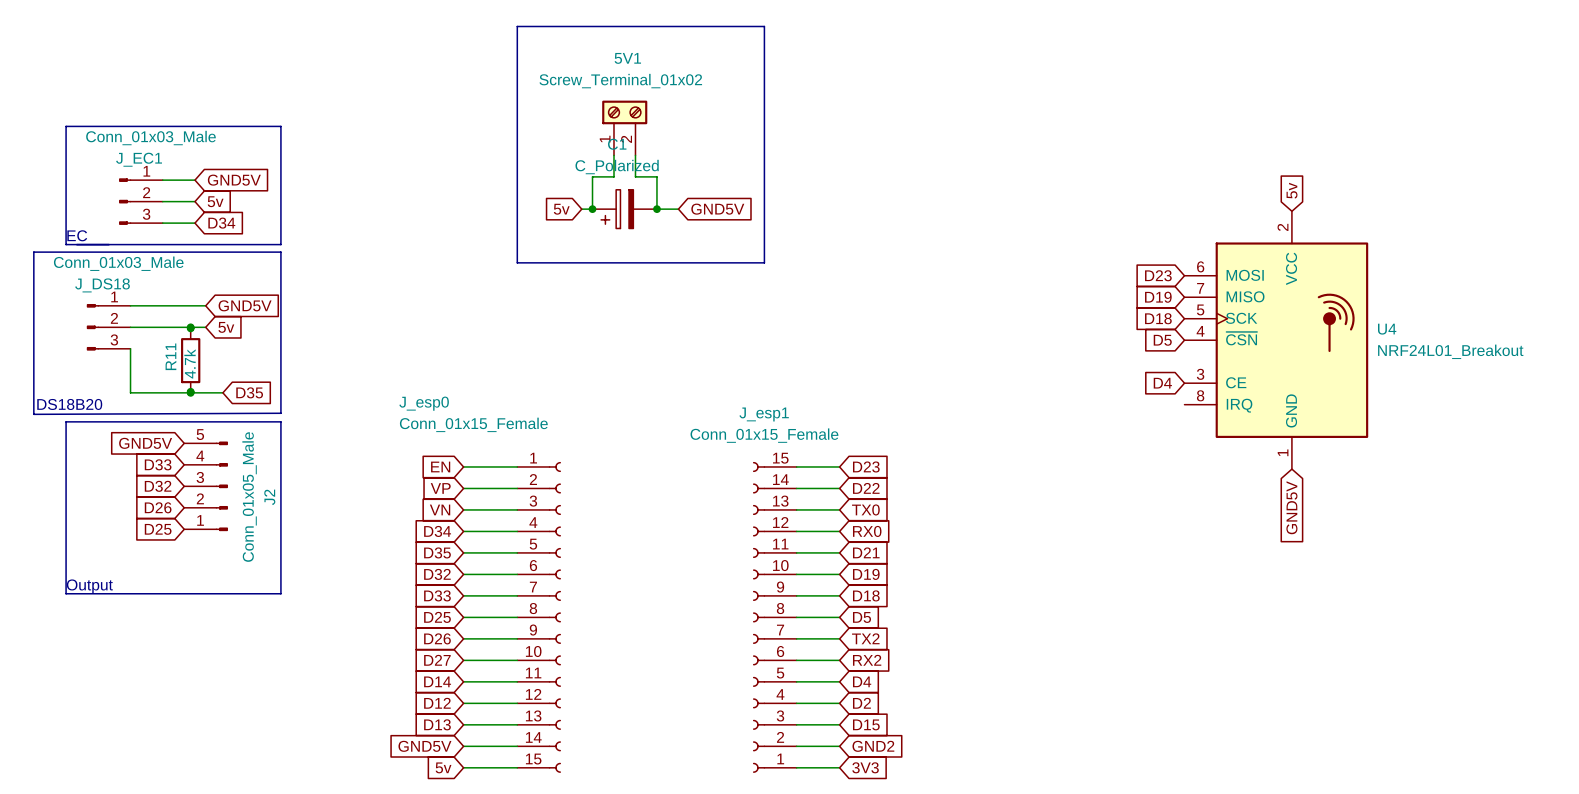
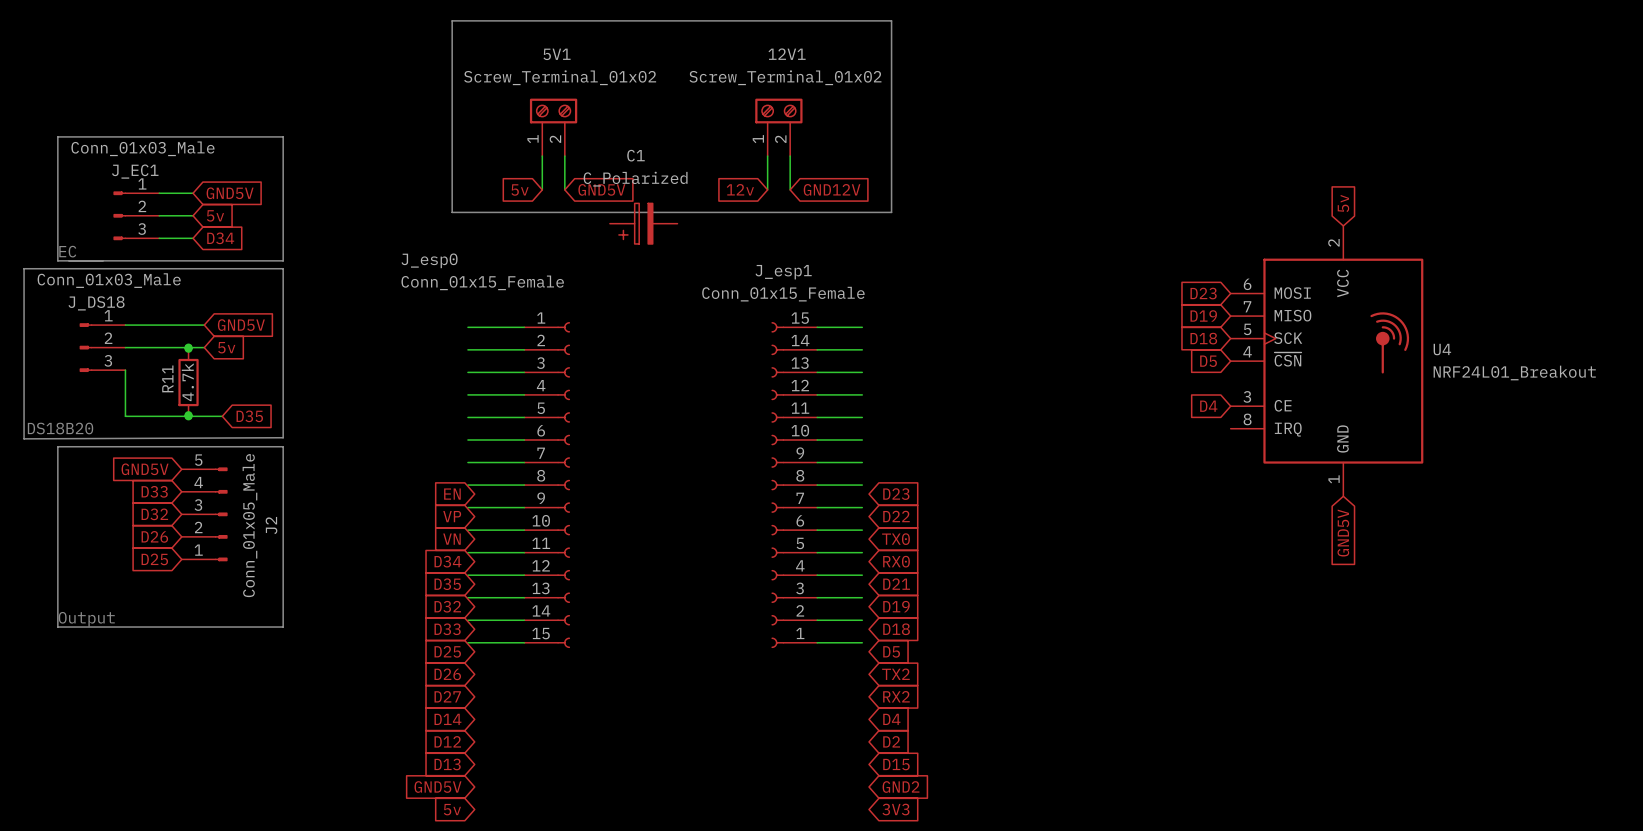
line: none -> (452, 20) (891, 20) (891, 212) (452, 212) (452, 20)
line: (517, 26) (764, 26) (764, 262) (517, 262) (517, 26) -> none
12V1: none -> Screw_Terminal_01x02 (778, 127)
5V1 position: (624, 128) -> (553, 127)
wire: none -> (542, 156) (542, 189)
wire: none -> (564, 156) (564, 189)
wire: none -> (767, 156) (767, 189)
wire: (614, 155) (614, 176) (592, 176) (592, 209) (581, 209) -> none
wire: (635, 155) (635, 176) (656, 176) (656, 209) (678, 209) -> none
global label: none -> 12v (740, 189)
global label: none -> GND12V (832, 189)
global label position: 5v (561, 209) -> 5v (520, 189)
junction: (592, 209) -> none
junction: (656, 209) -> none
global label position: GND5V (717, 209) -> GND5V (601, 189)
wire: (463, 466) (517, 466) -> (467, 327) (524, 327)
wire: (796, 466) (839, 466) -> (817, 327) (862, 327)
wire: (463, 488) (517, 488) -> (467, 349) (524, 349)
wire: (796, 488) (839, 488) -> (817, 349) (862, 349)
wire: (463, 509) (517, 509) -> (467, 372) (524, 372)
wire: (796, 509) (839, 509) -> (817, 372) (862, 372)
wire: (463, 531) (517, 531) -> (467, 394) (524, 394)
wire: (796, 531) (839, 531) -> (817, 394) (862, 394)
wire: (463, 552) (517, 552) -> (467, 417) (524, 417)
wire: (796, 552) (839, 552) -> (817, 417) (862, 417)
wire: (463, 574) (517, 574) -> (467, 439) (524, 439)
wire: (796, 574) (839, 574) -> (817, 439) (862, 439)
wire: (463, 595) (517, 595) -> (467, 462) (524, 462)
wire: (796, 595) (839, 595) -> (817, 462) (862, 462)
wire: (463, 617) (517, 617) -> (467, 485) (524, 485)
J_esp0 position: (539, 617) -> (547, 485)
J_esp1 position: (774, 617) -> (794, 485)
wire: (796, 617) (839, 617) -> (817, 485) (862, 485)
wire: (463, 638) (517, 638) -> (467, 507) (524, 507)
wire: (796, 638) (839, 638) -> (817, 507) (862, 507)
wire: (463, 660) (517, 660) -> (467, 530) (524, 530)
wire: (796, 660) (839, 660) -> (817, 530) (862, 530)
wire: (463, 681) (517, 681) -> (467, 552) (524, 552)
wire: (796, 681) (839, 681) -> (817, 552) (862, 552)
wire: (463, 703) (517, 703) -> (467, 575) (524, 575)
wire: (796, 703) (839, 703) -> (817, 575) (862, 575)
wire: (463, 724) (517, 724) -> (467, 597) (524, 597)
wire: (796, 724) (839, 724) -> (817, 597) (862, 597)
wire: (463, 746) (517, 746) -> (467, 620) (524, 620)
wire: (796, 746) (839, 746) -> (817, 620) (862, 620)
wire: (463, 767) (517, 767) -> (467, 642) (524, 642)
wire: (796, 767) (839, 767) -> (817, 642) (862, 642)

